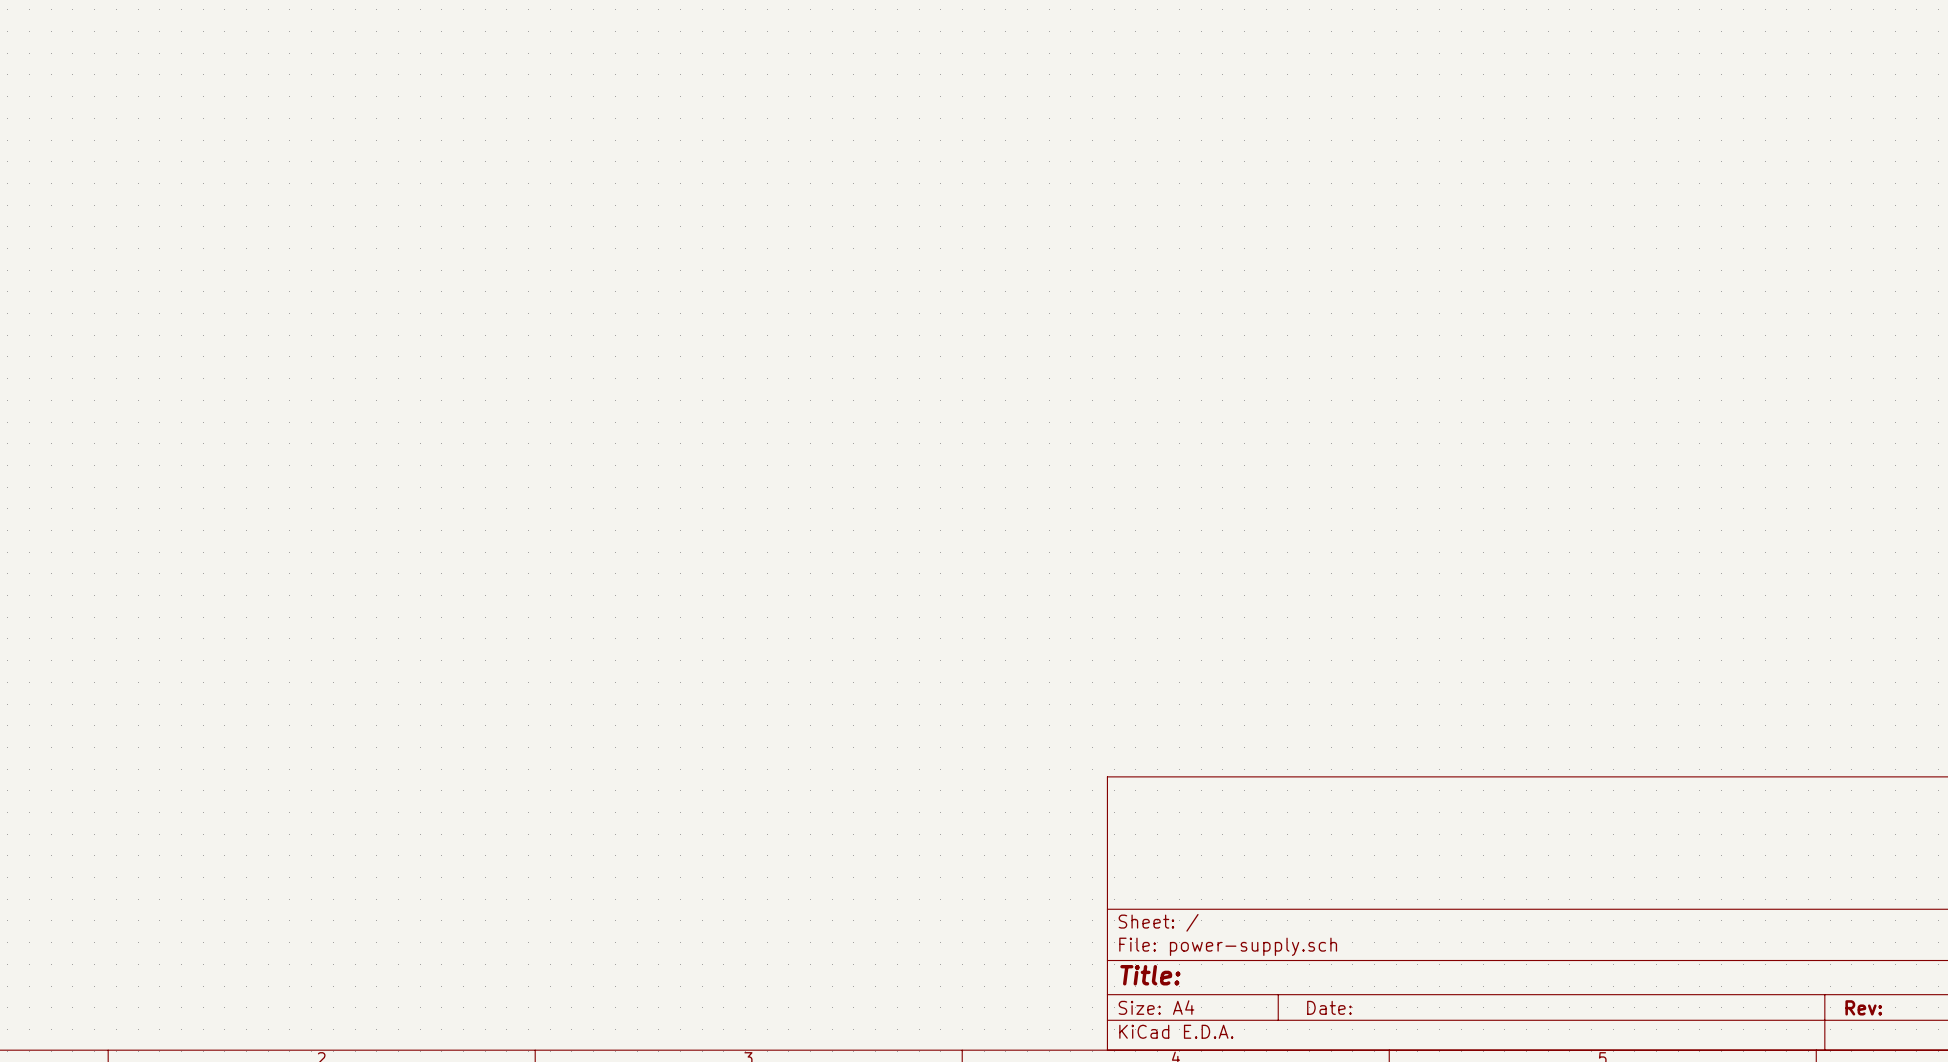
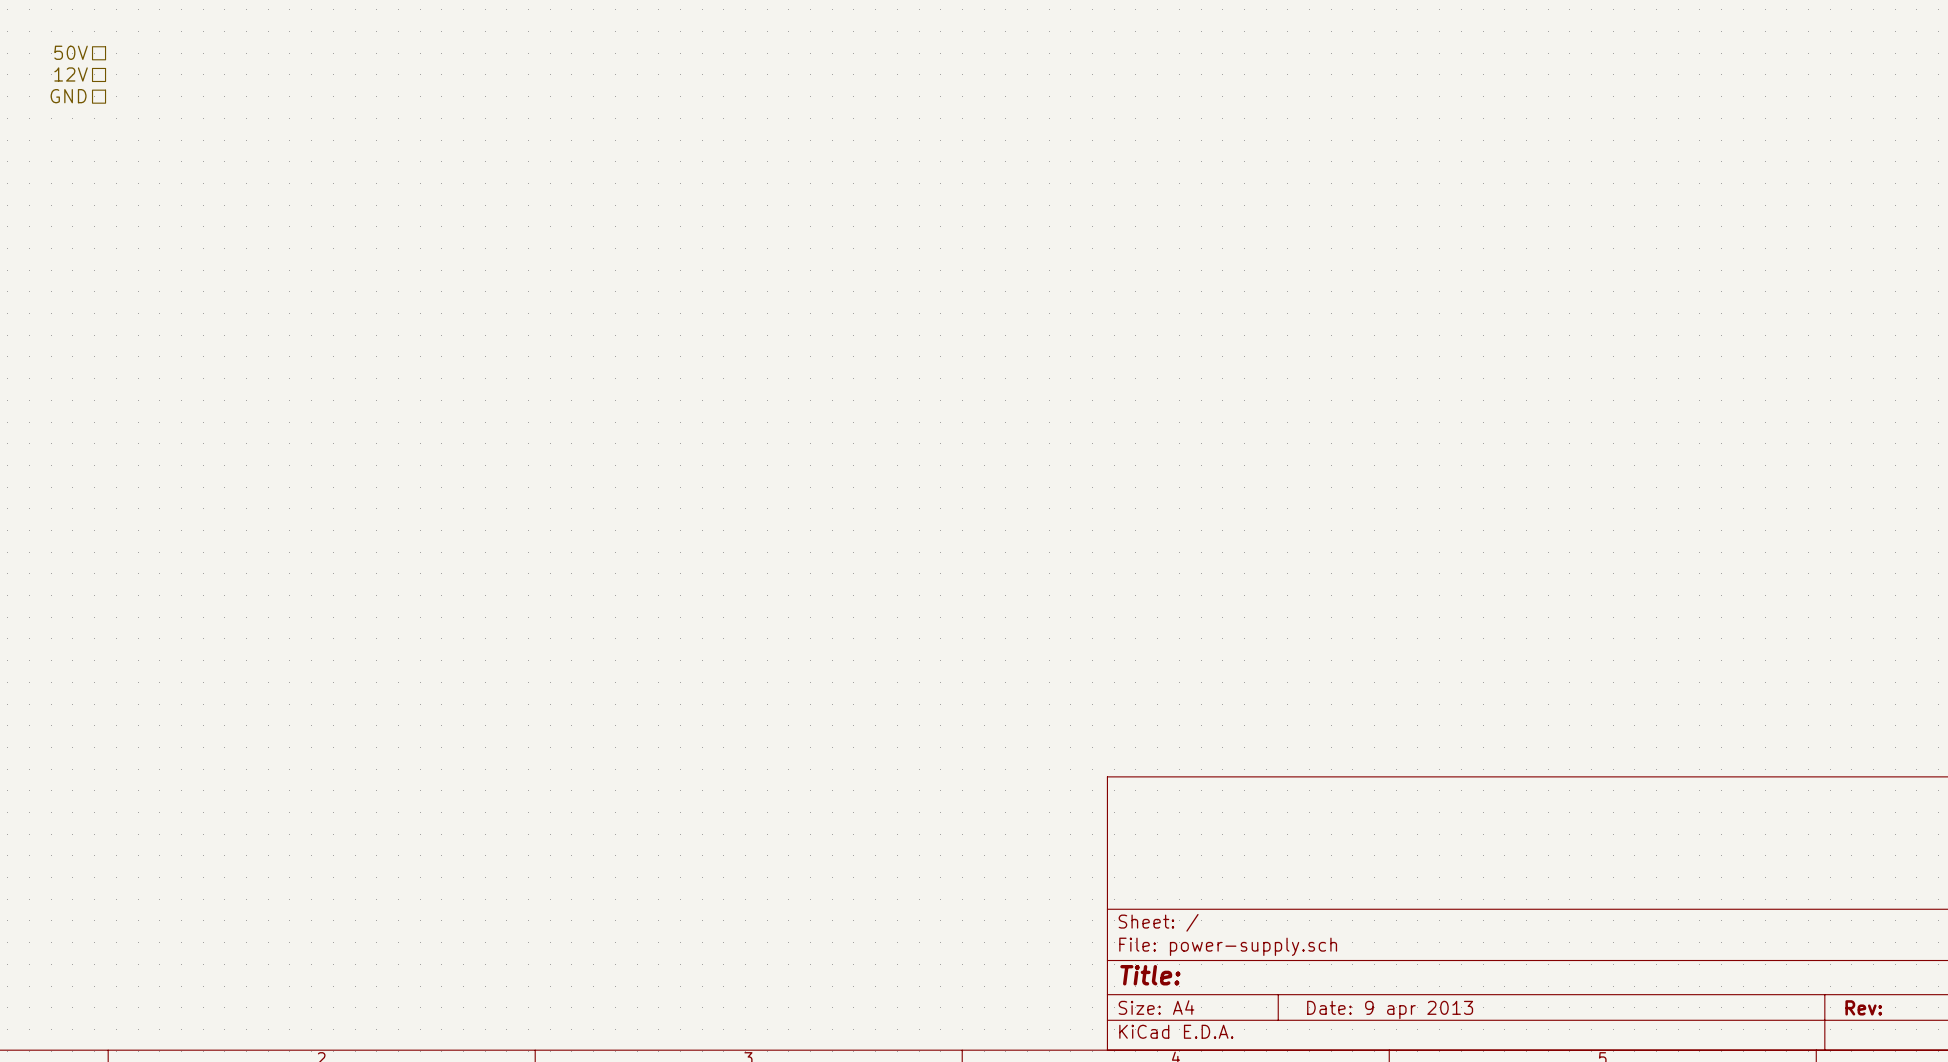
hierarchical label: none -> 50V (71, 52)
hierarchical label: none -> 12V (71, 74)
hierarchical label: none -> GND (68, 96)
title block: Date: (1329, 1007) -> Date: 9 apr 2013 (1390, 1009)

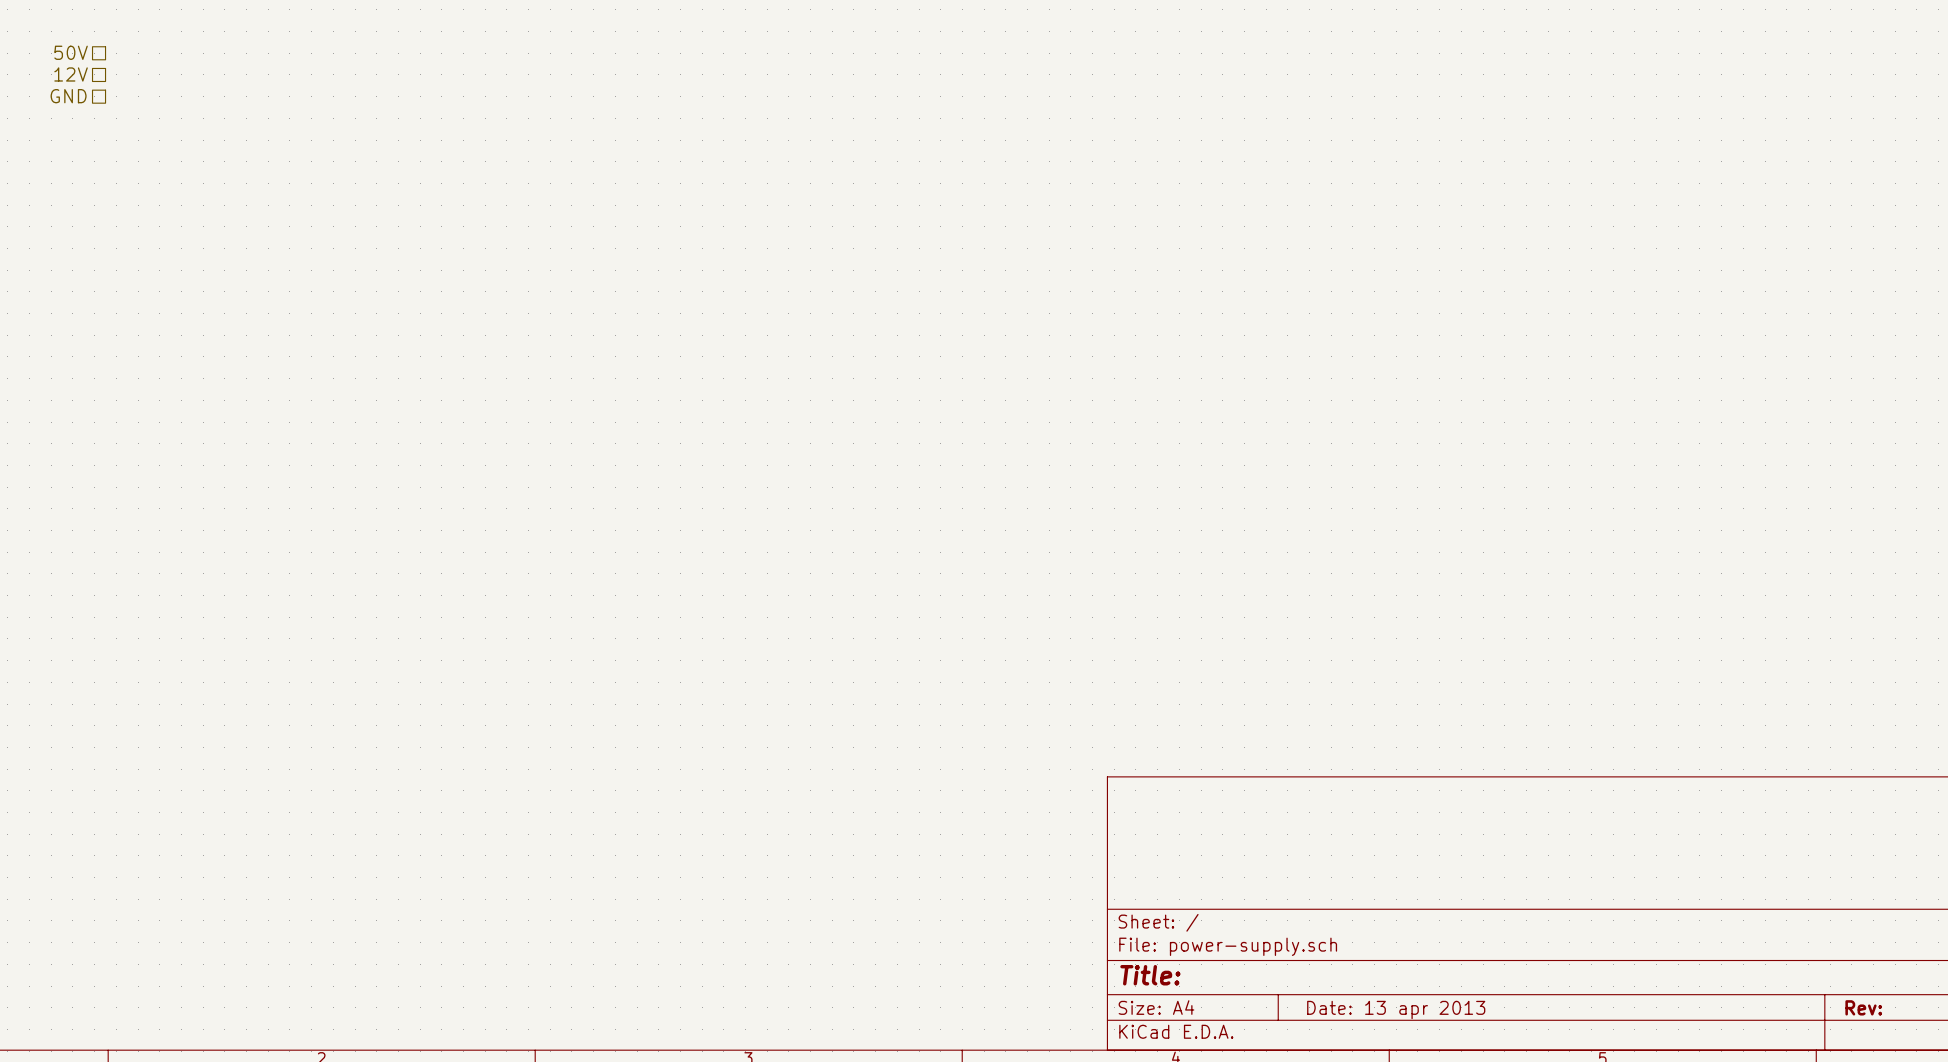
title block: Date: 9 apr 2013 (1390, 1009) -> Date: 13 apr 2013 (1396, 1009)

